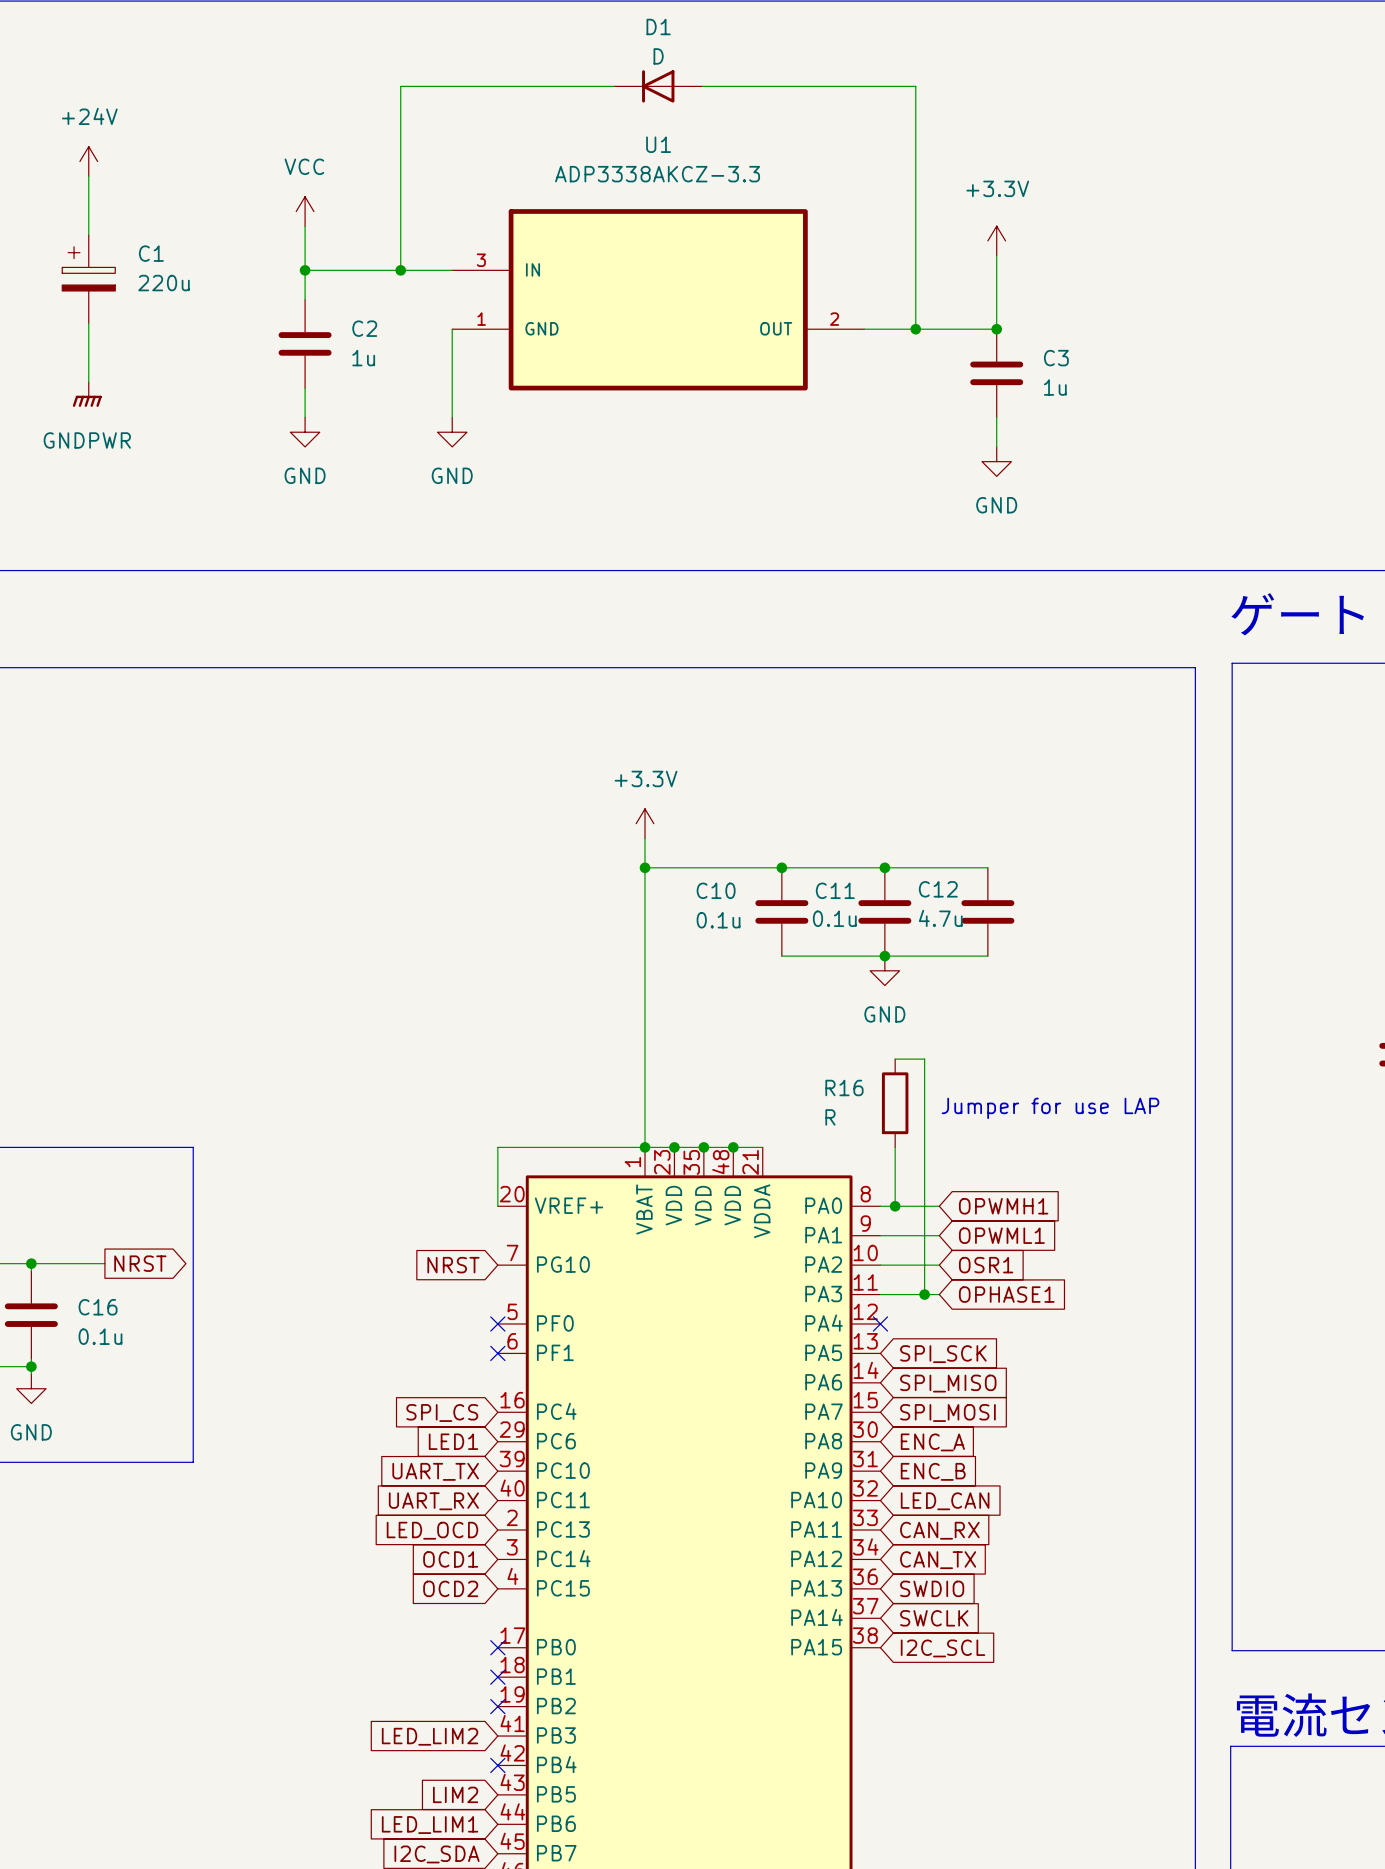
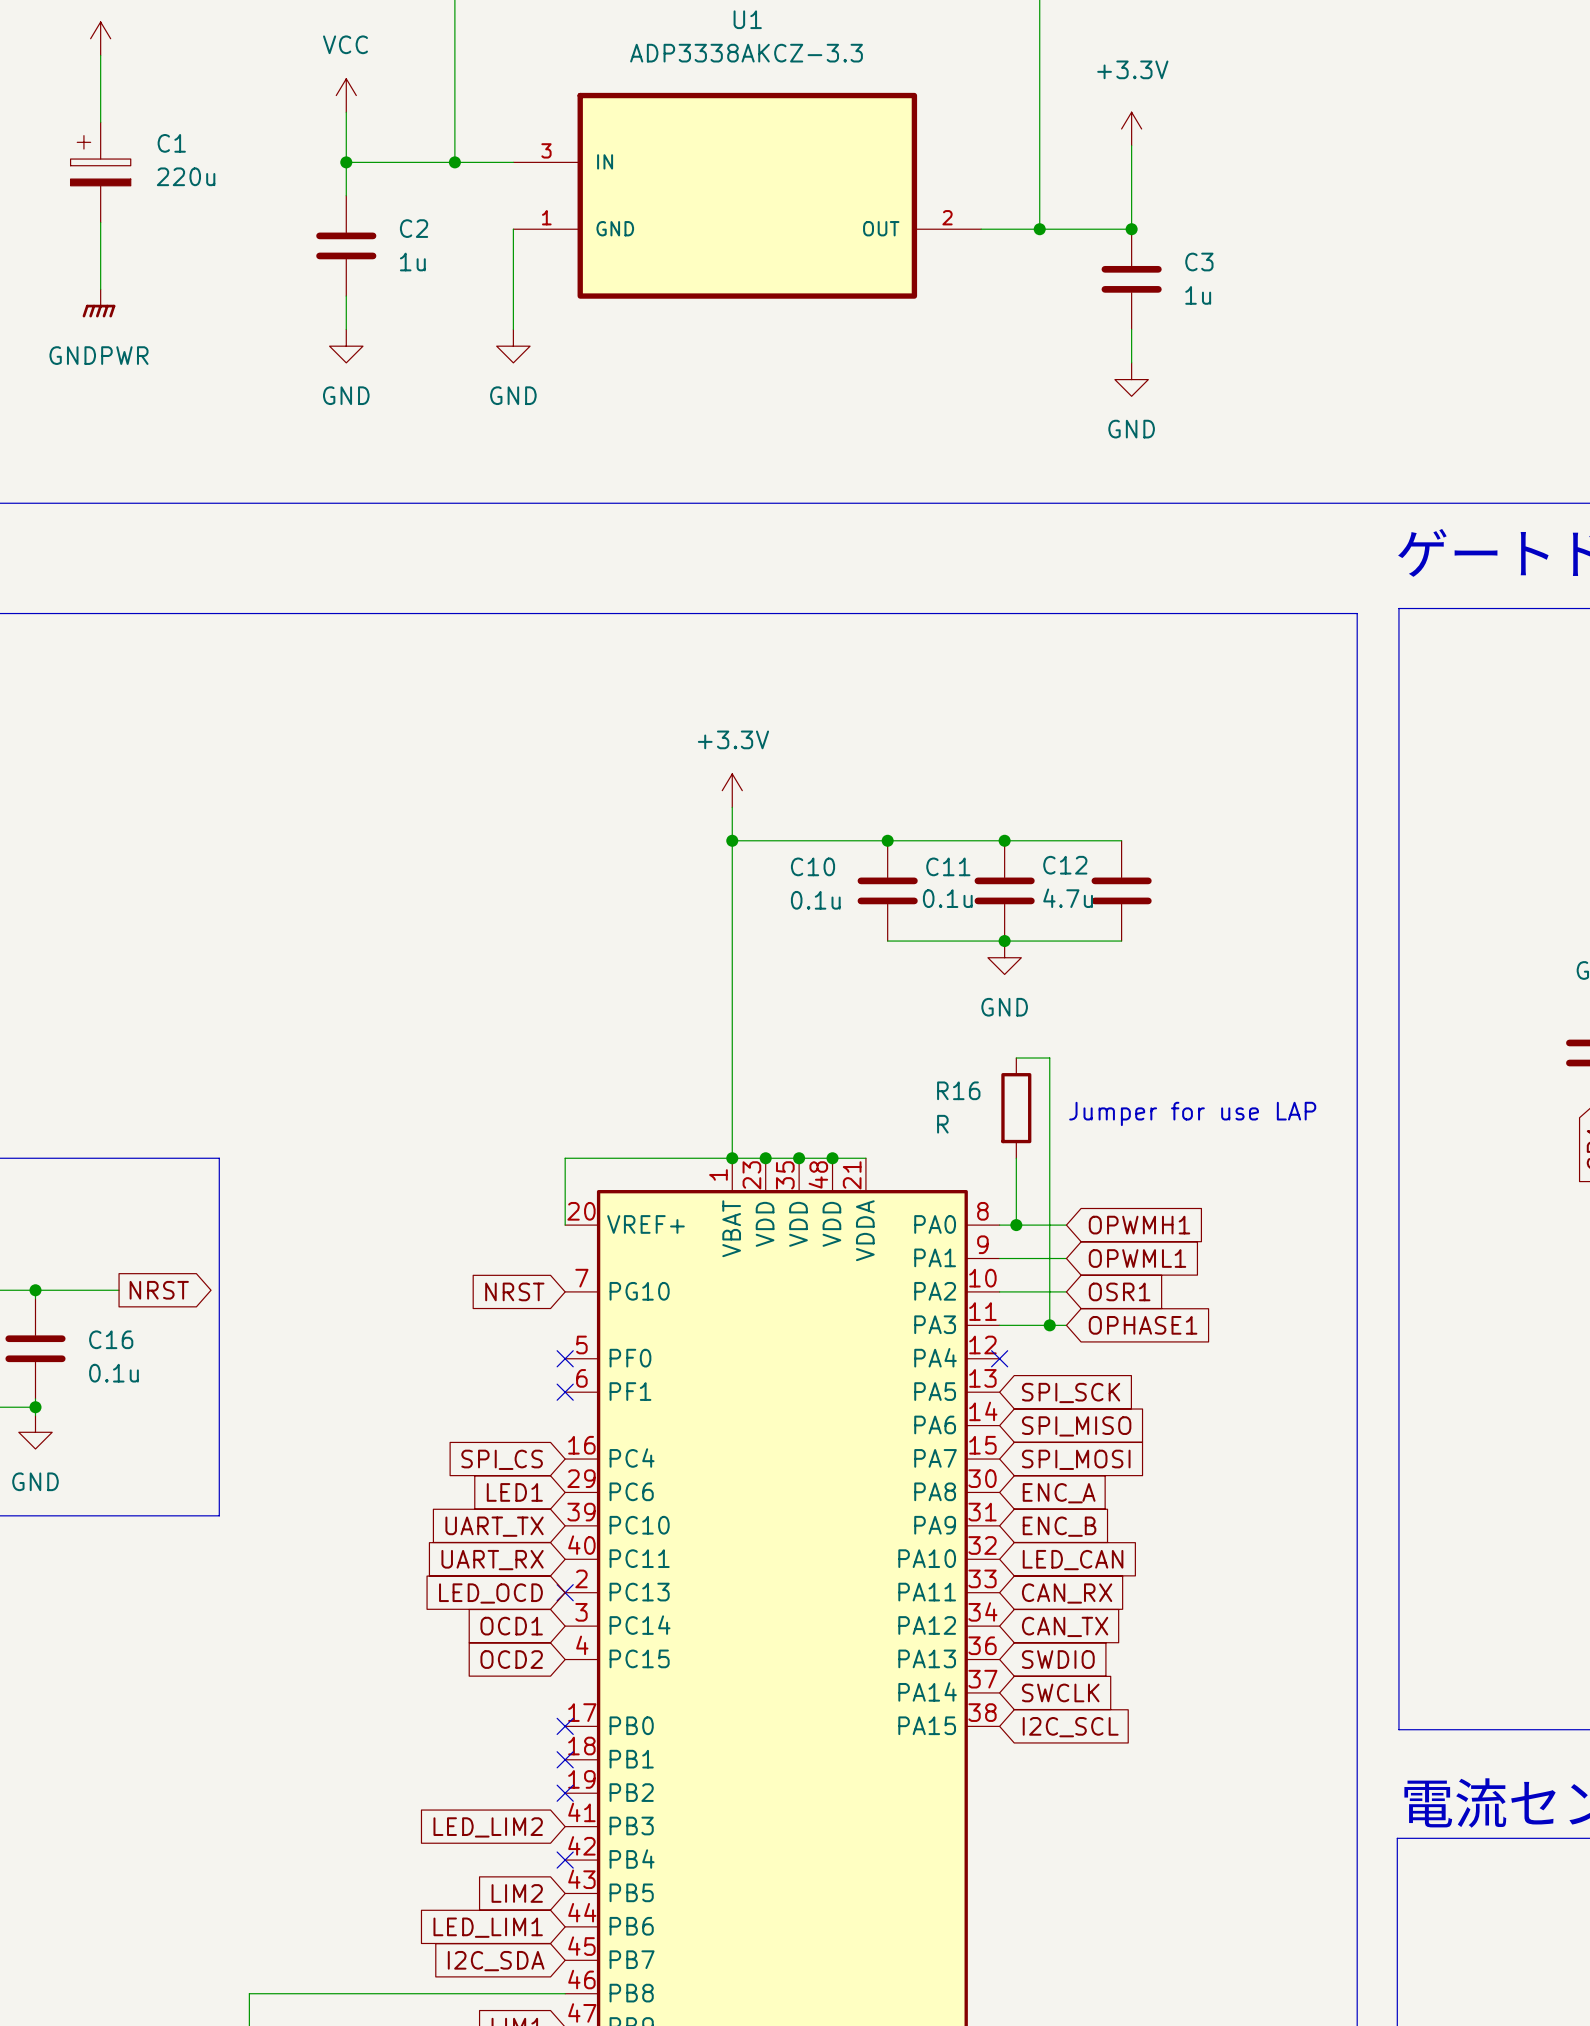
no-connect mark: none -> (565, 1592)

